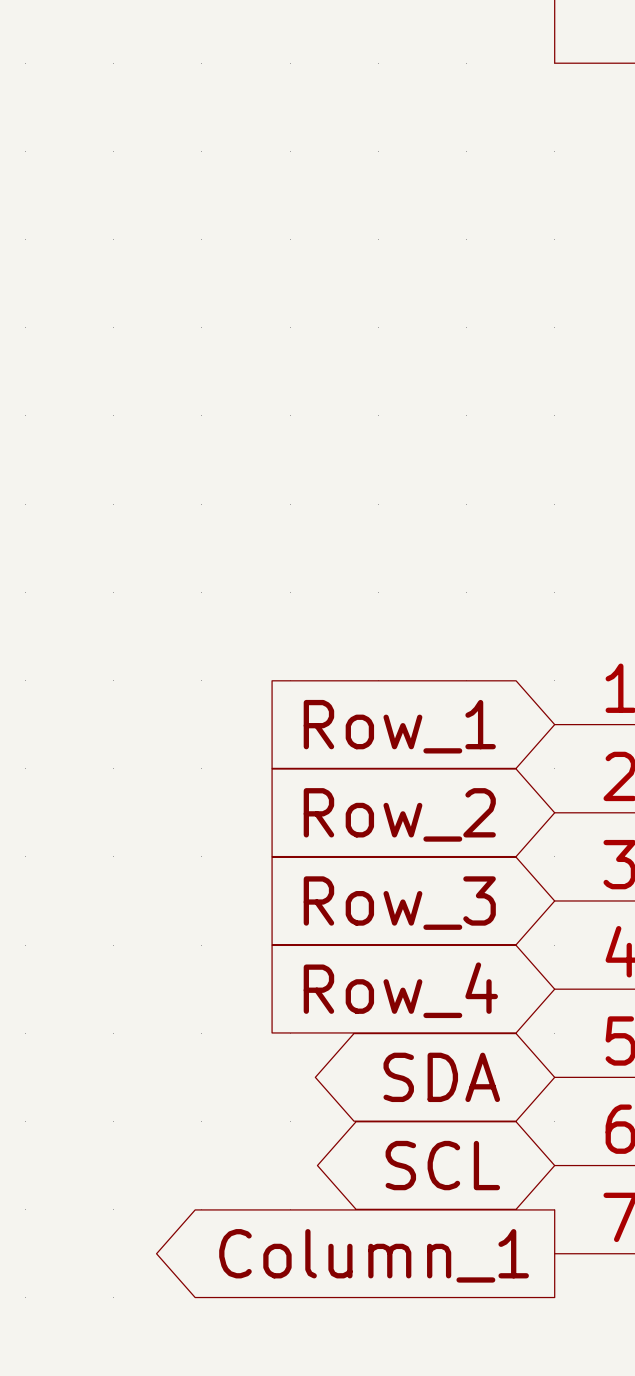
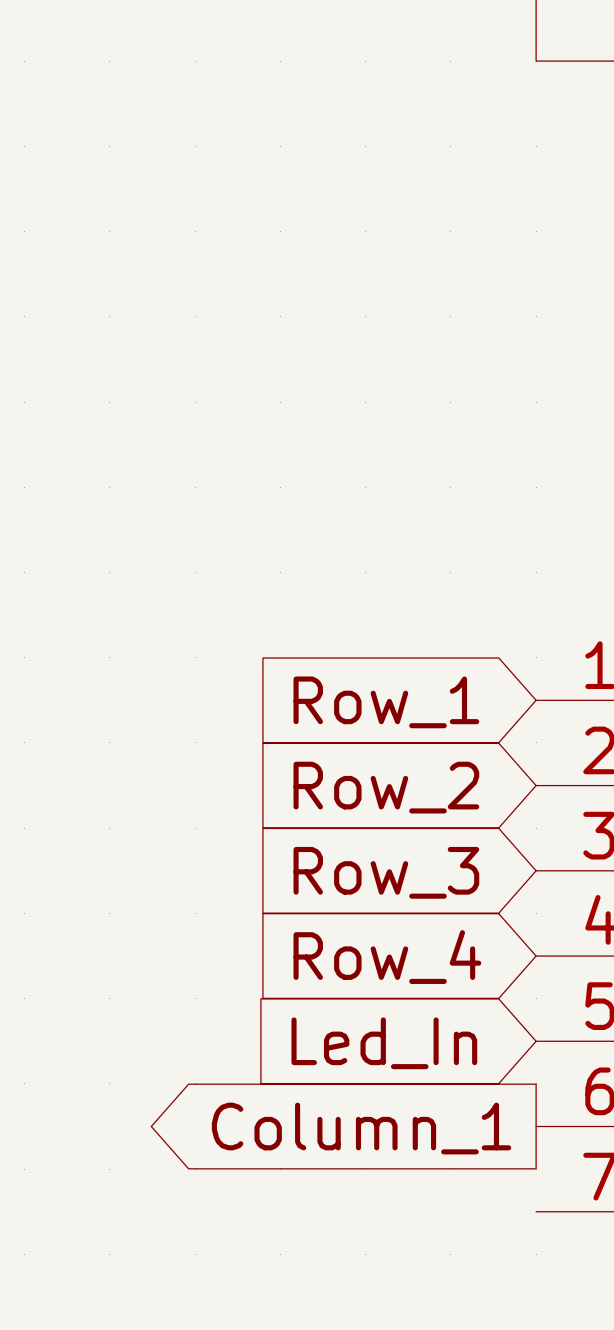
global label shape: bidirectional (441, 1077) -> input (384, 1043)
global label: SDA (441, 1077) -> Led_In (384, 1043)
global label shape: bidirectional (442, 1165) -> output (361, 1128)
global label: SCL (442, 1165) -> Column_1 (361, 1128)
global label: Column_1 (374, 1255) -> none

